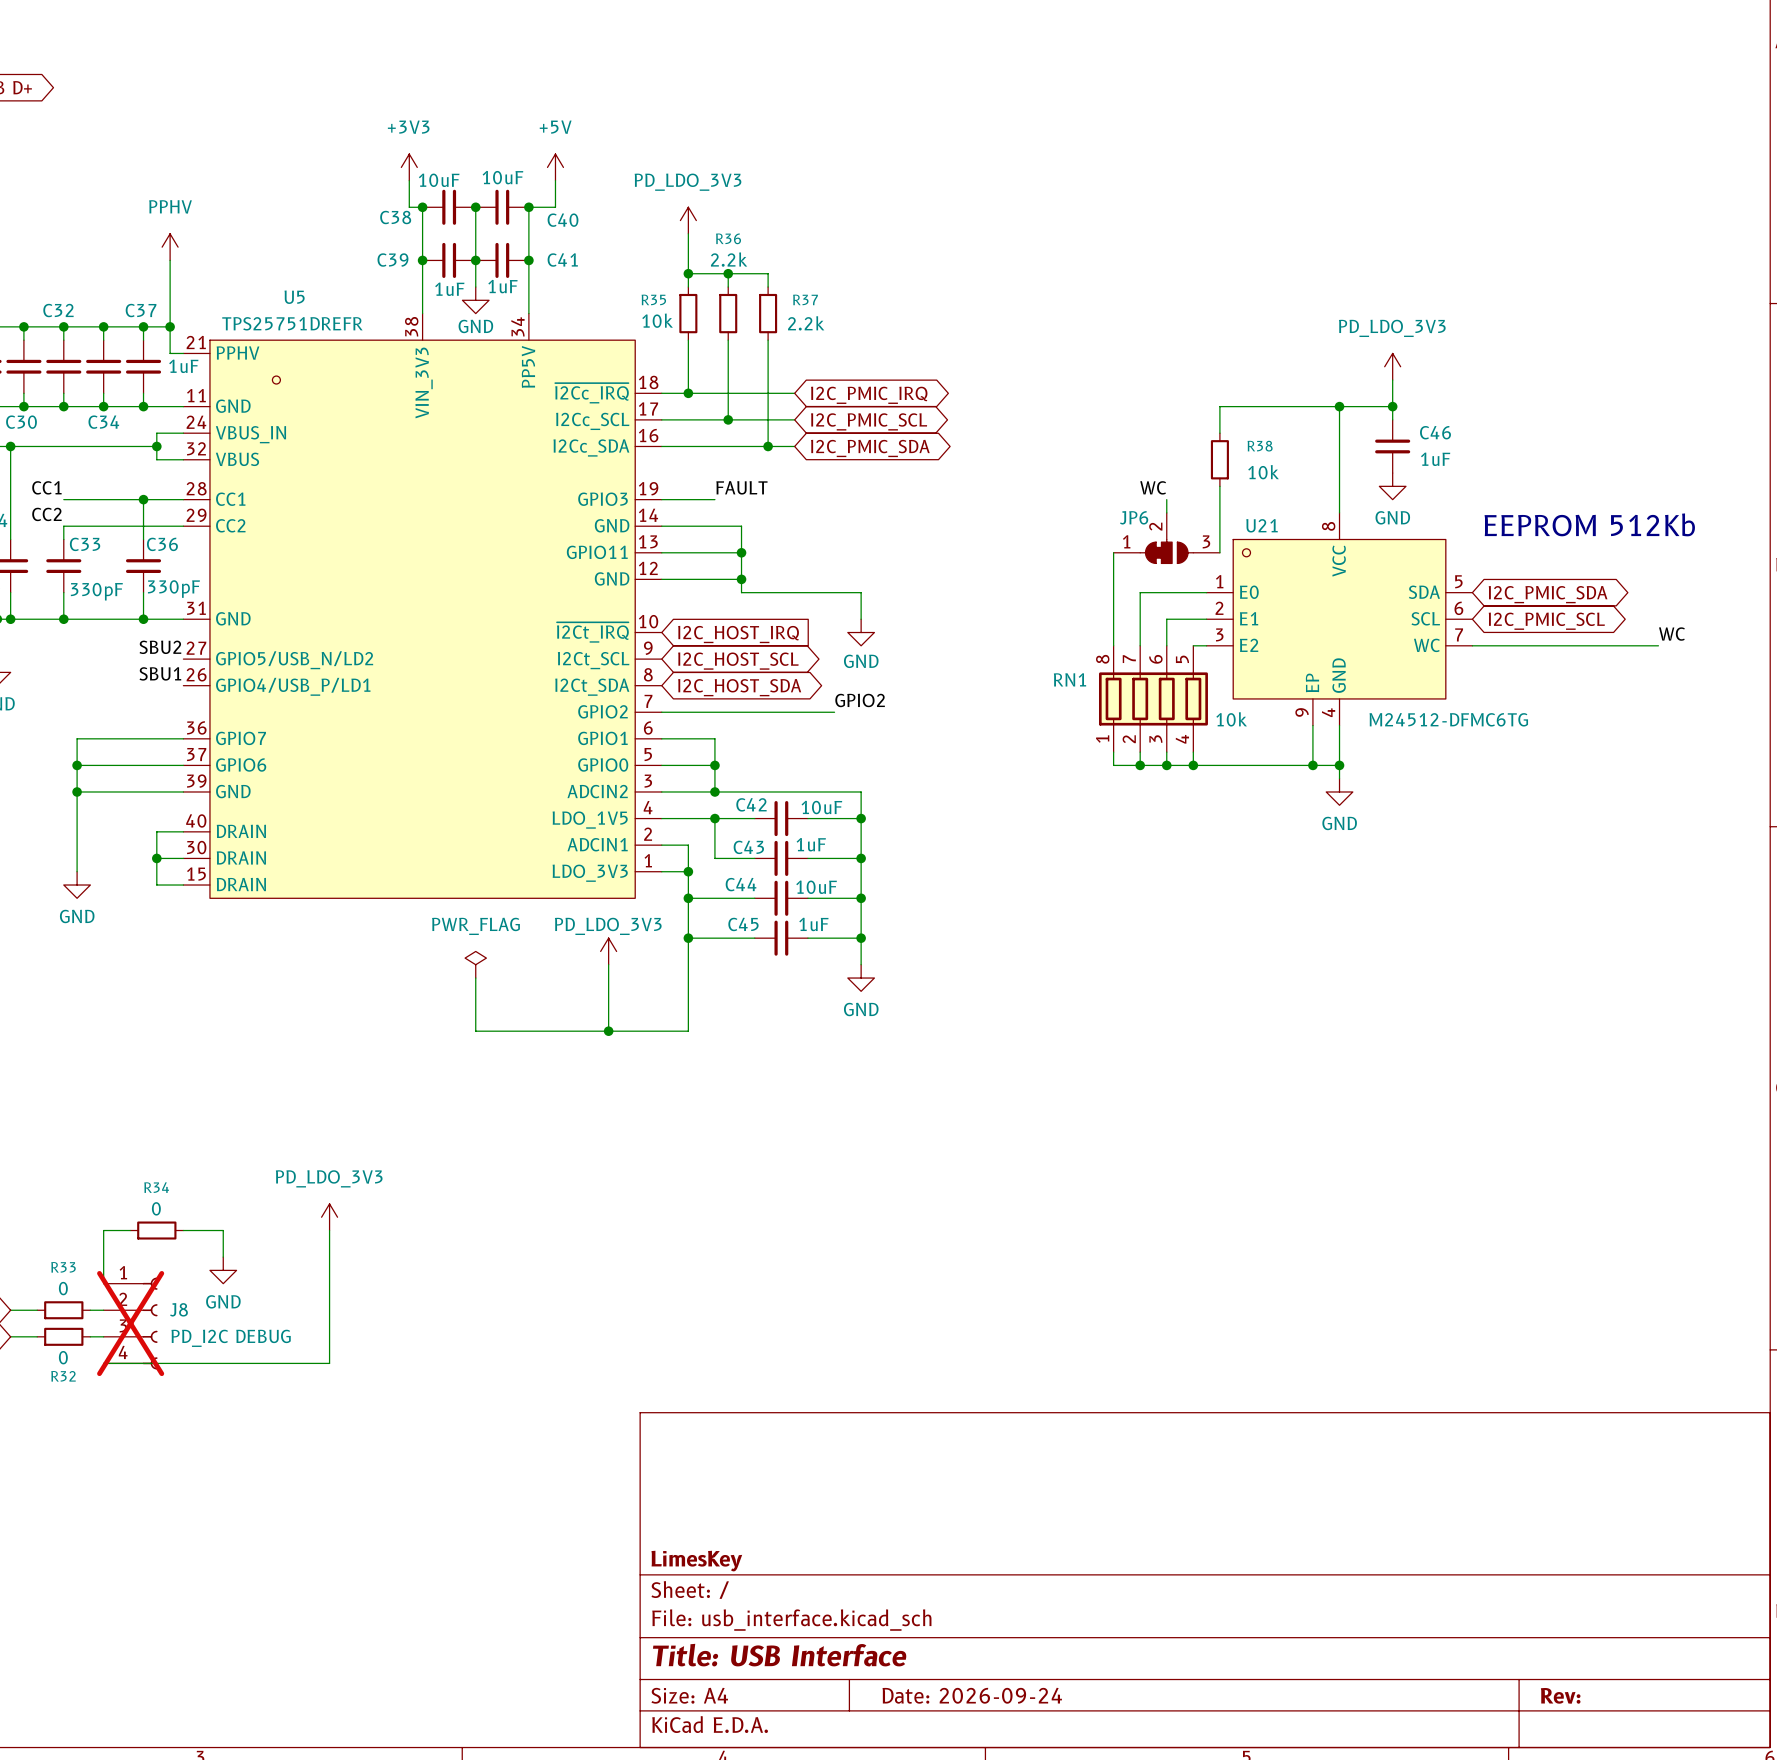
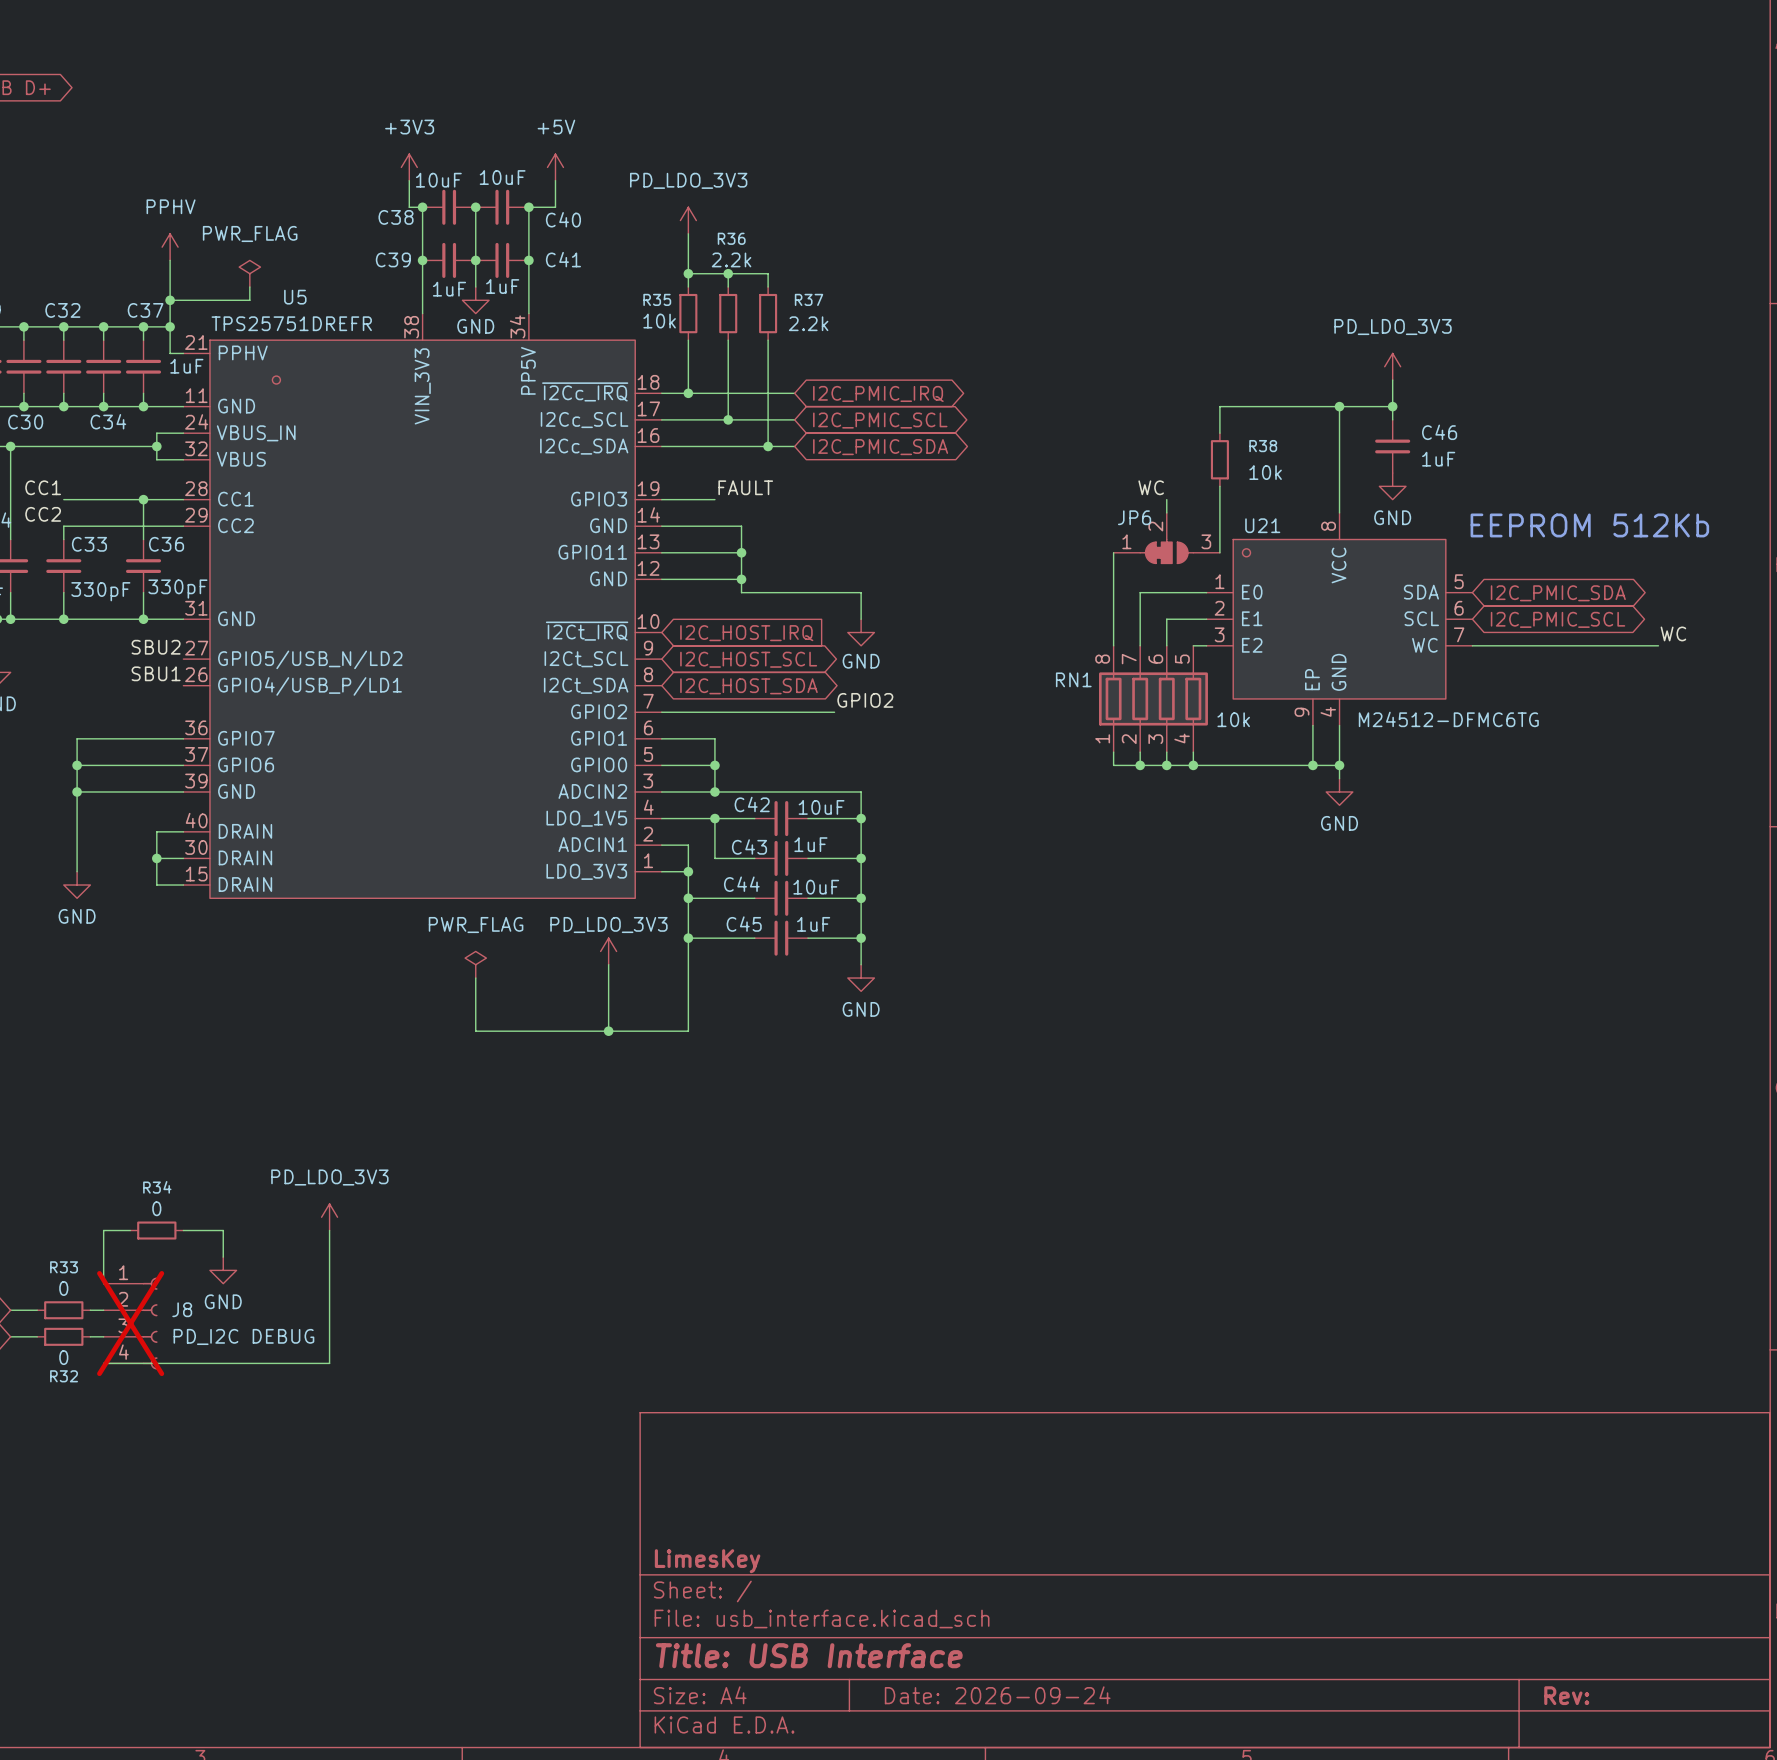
power symbol: none -> PWR_FLAG (249, 273)
wire: none -> (249, 287) (249, 300) (170, 300)
junction: none -> (170, 300)

